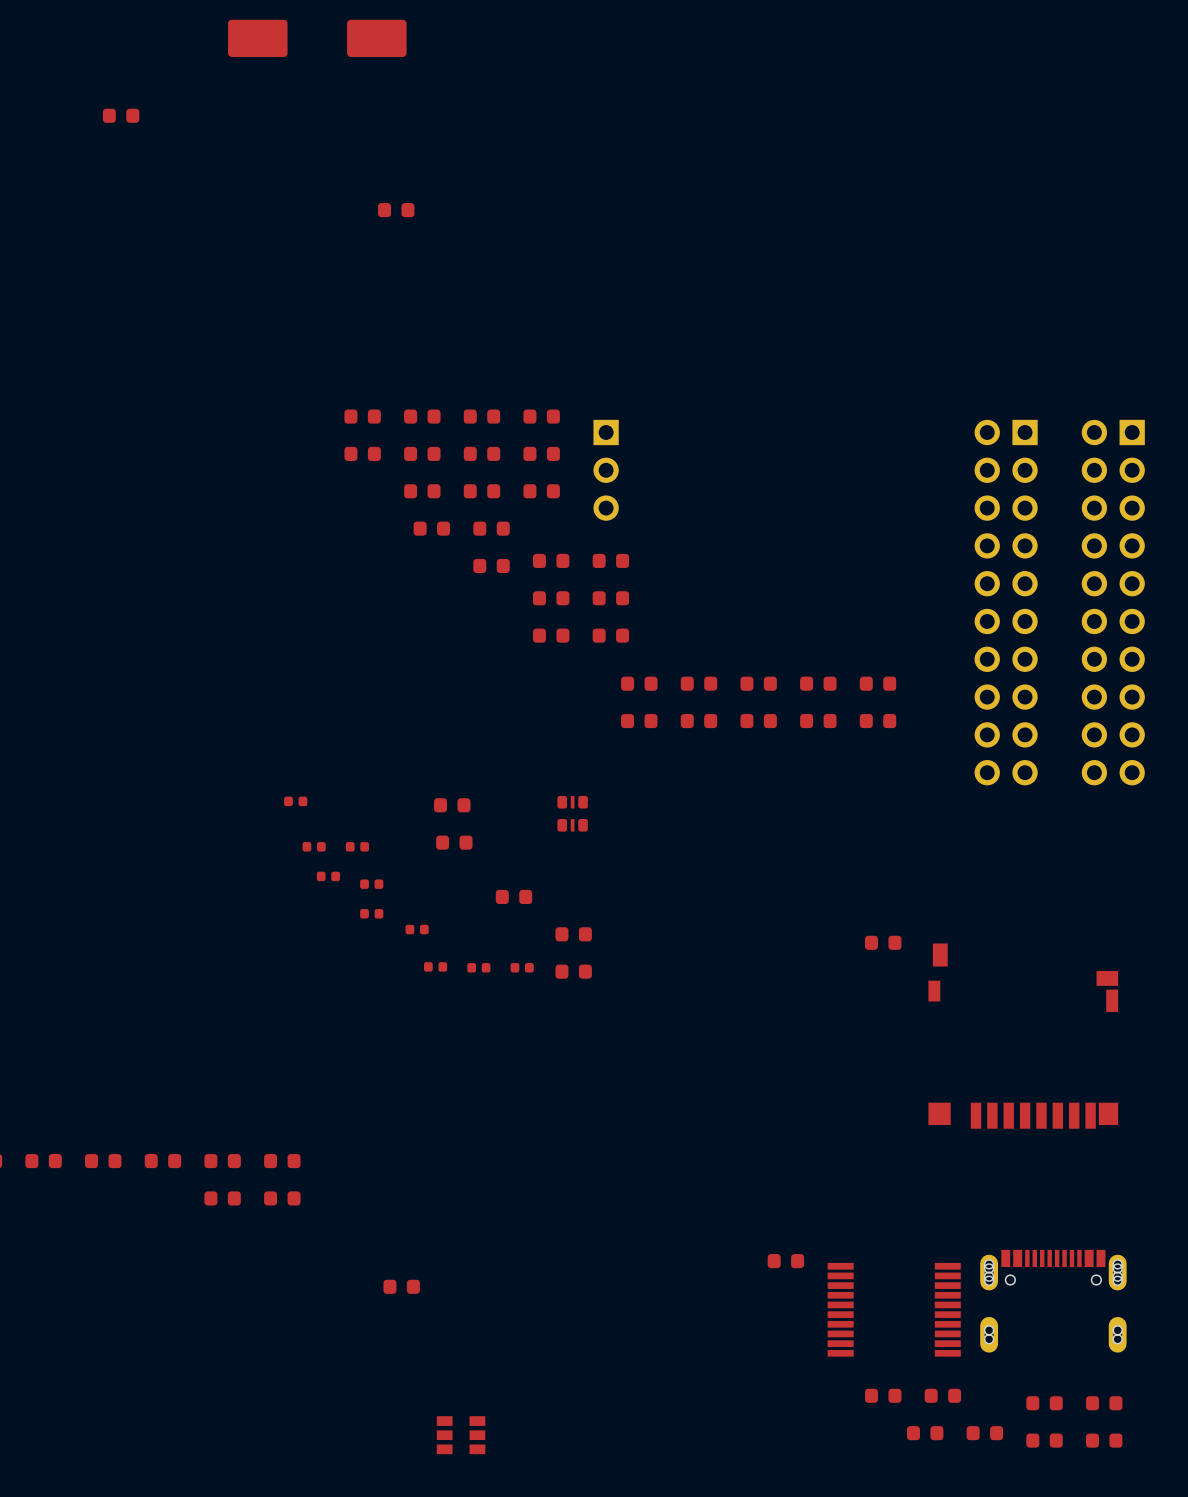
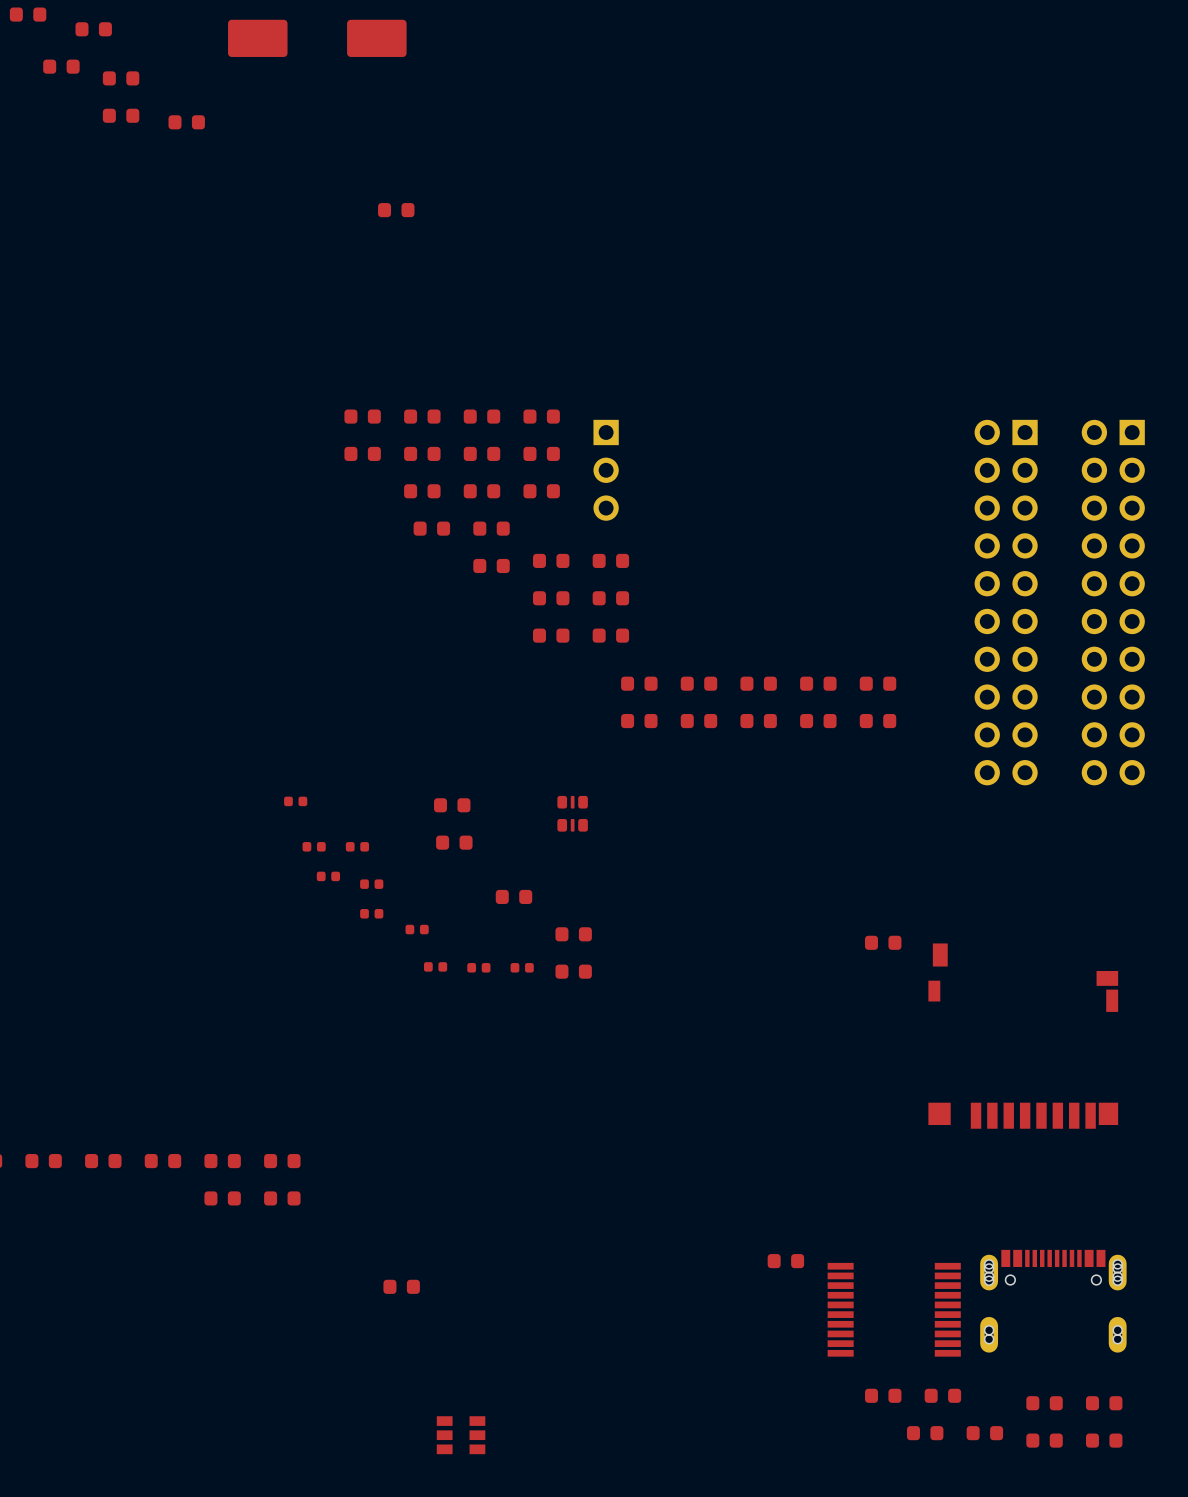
part: none -> (28, 14)
part: none -> (93, 29)
part: none -> (61, 66)
part: none -> (121, 78)
part: none -> (186, 122)

